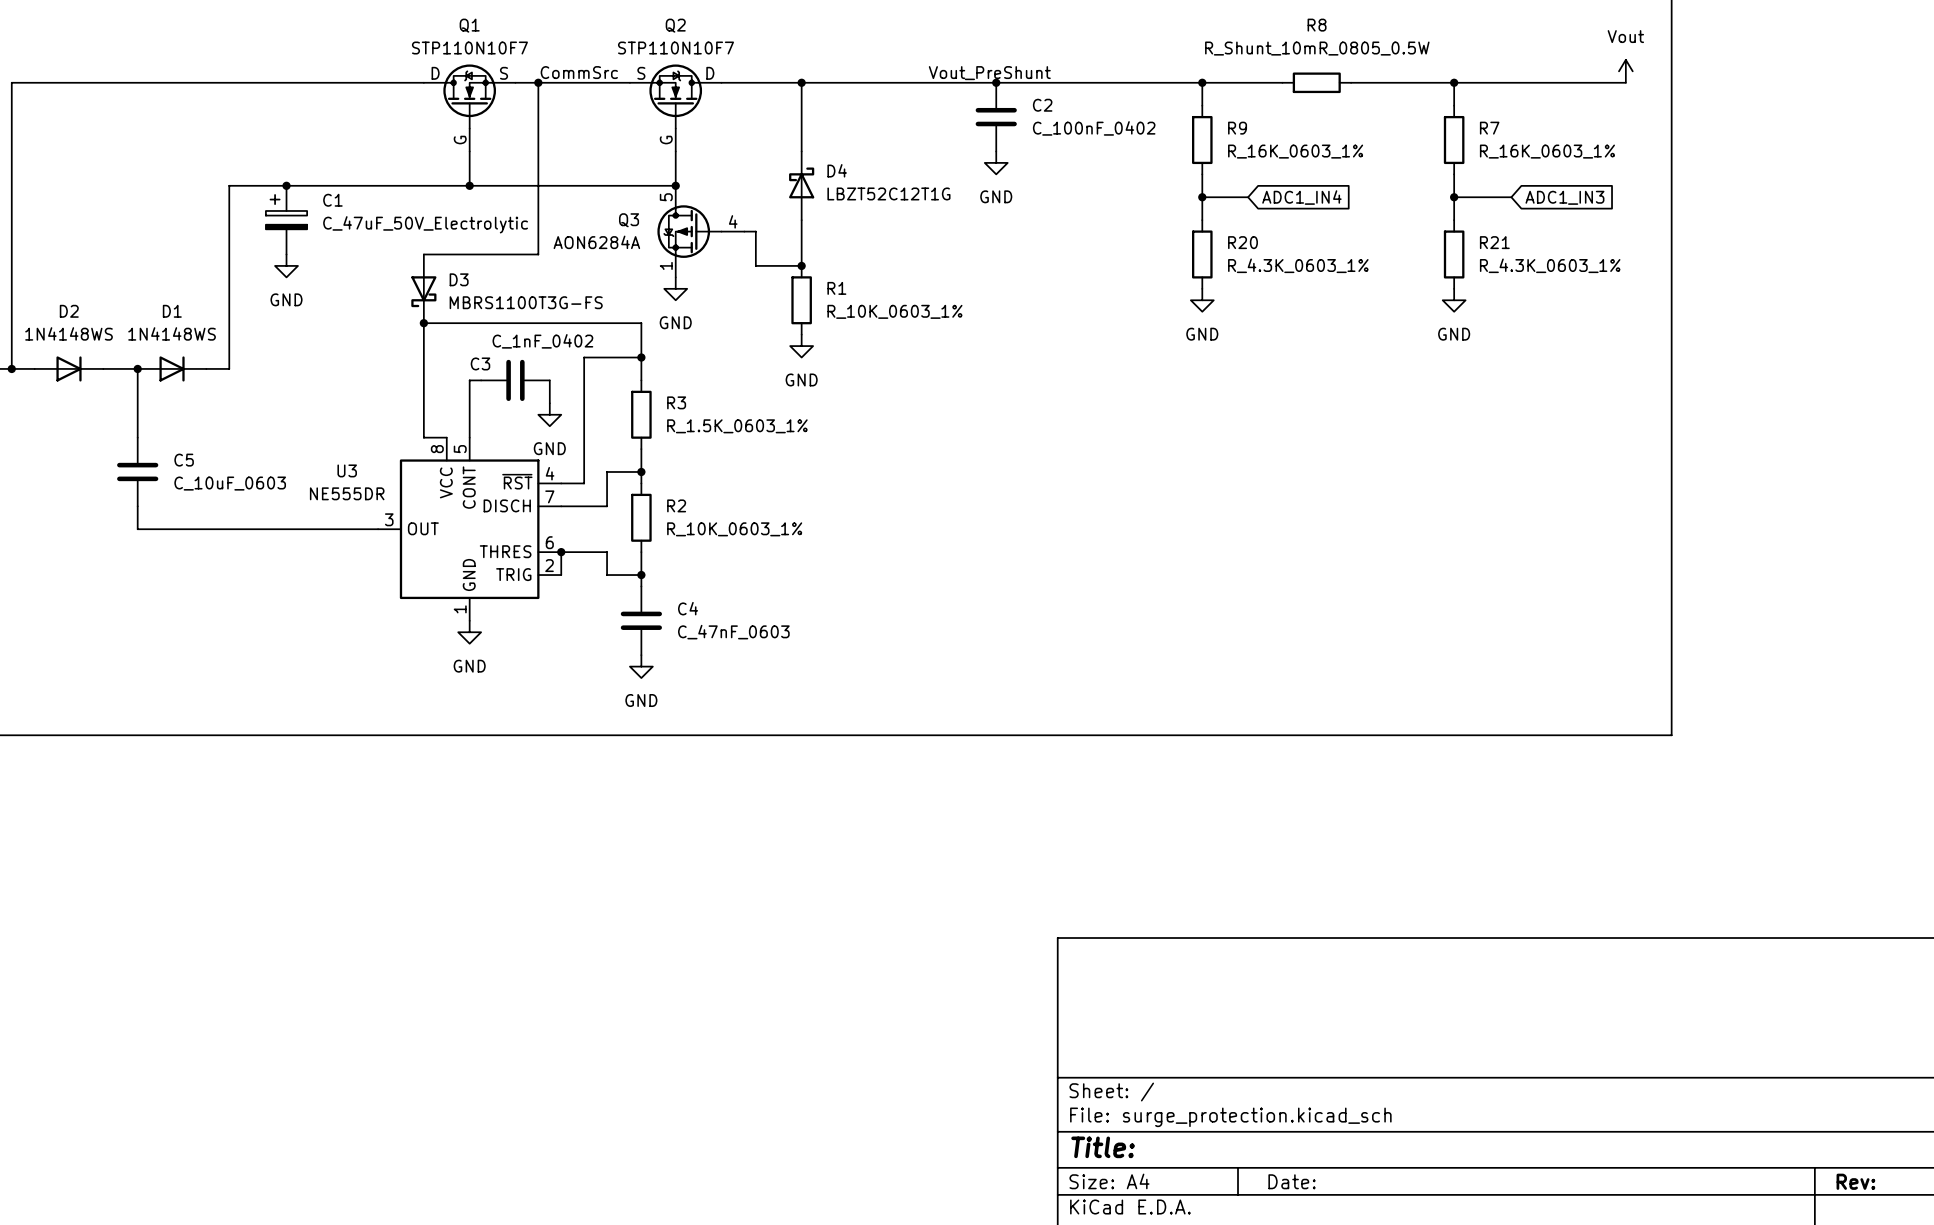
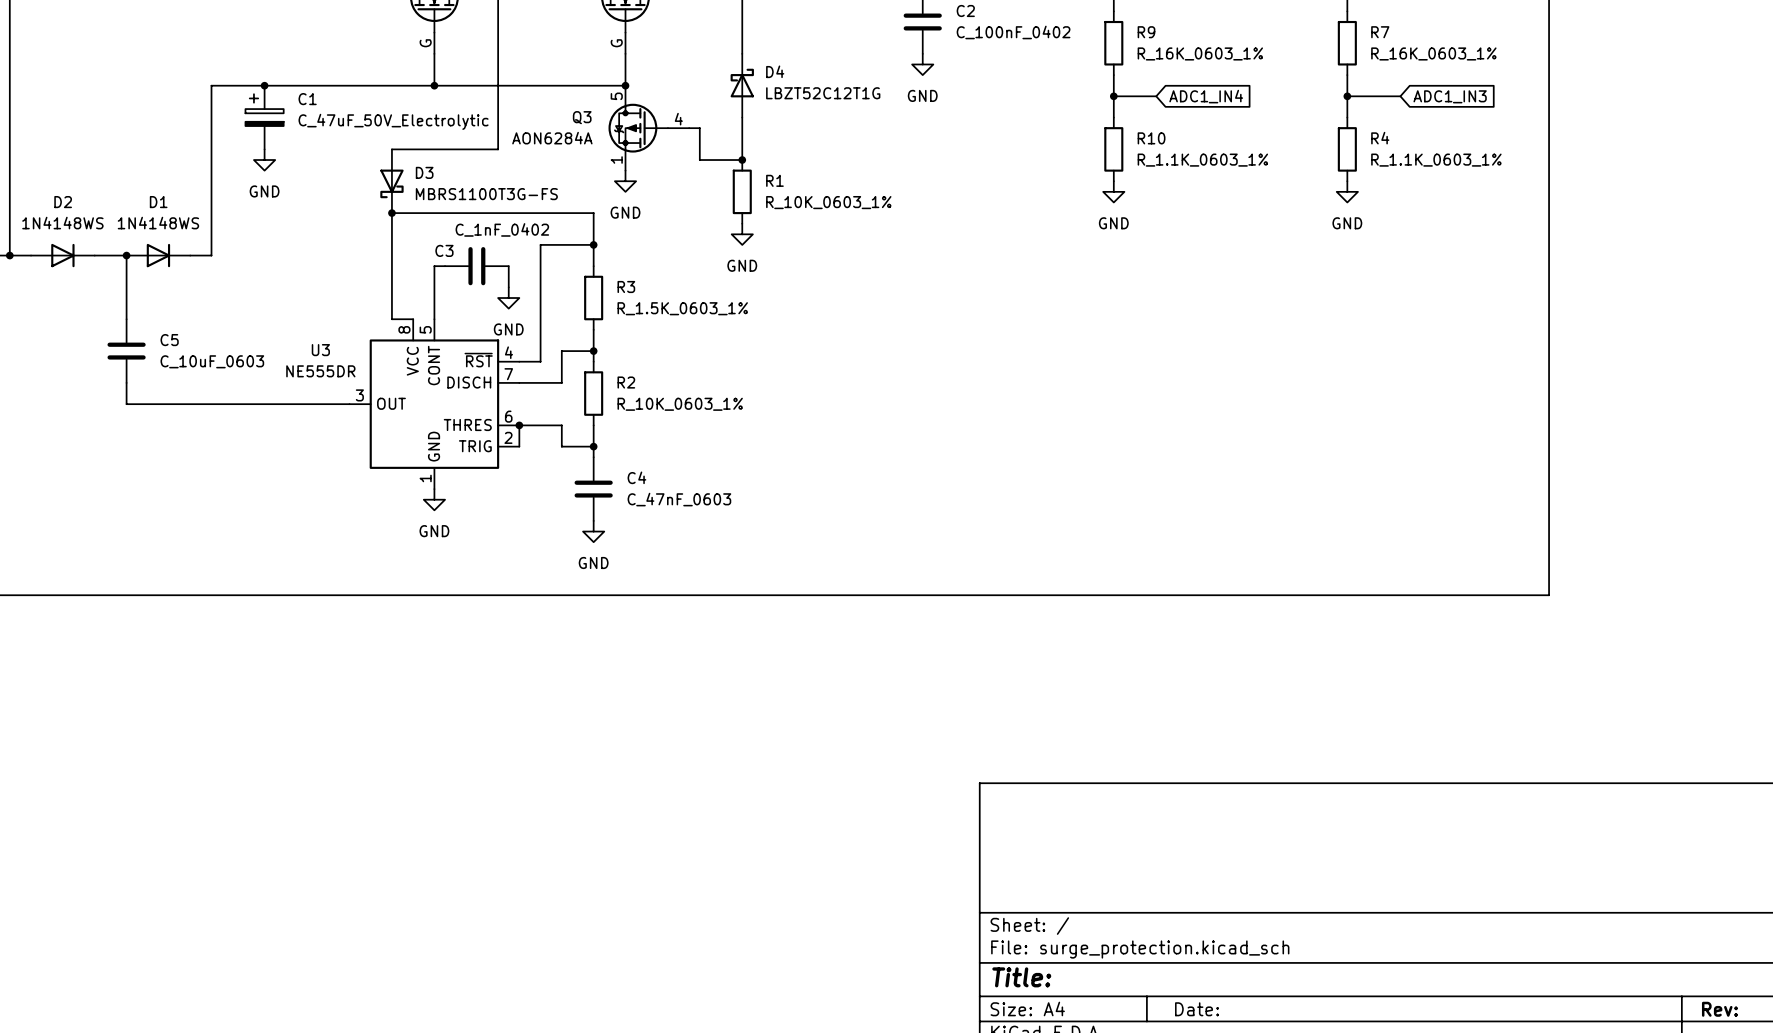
R20 name: R20 (1243, 242) -> R10 (1151, 138)
R21 name: R21 (1494, 242) -> R4 (1380, 138)
R20 value: R_4.3K_0603_1% (1298, 265) -> R_1.1K_0603_1% (1202, 160)
R21 value: R_4.3K_0603_1% (1550, 265) -> R_1.1K_0603_1% (1436, 160)

